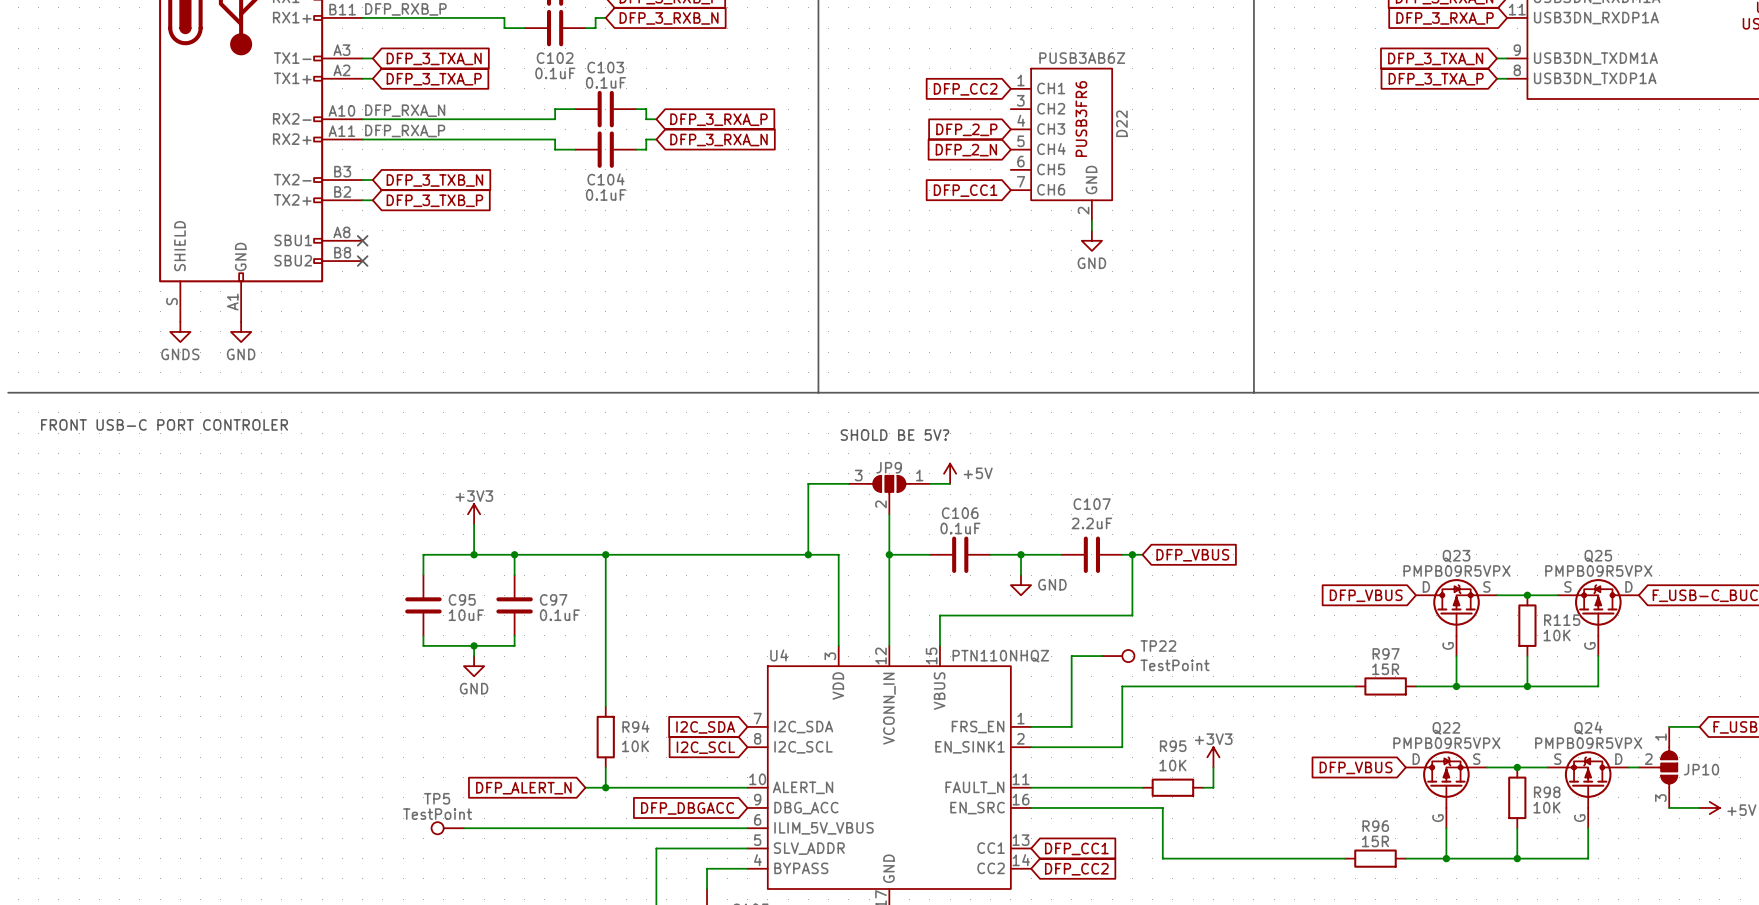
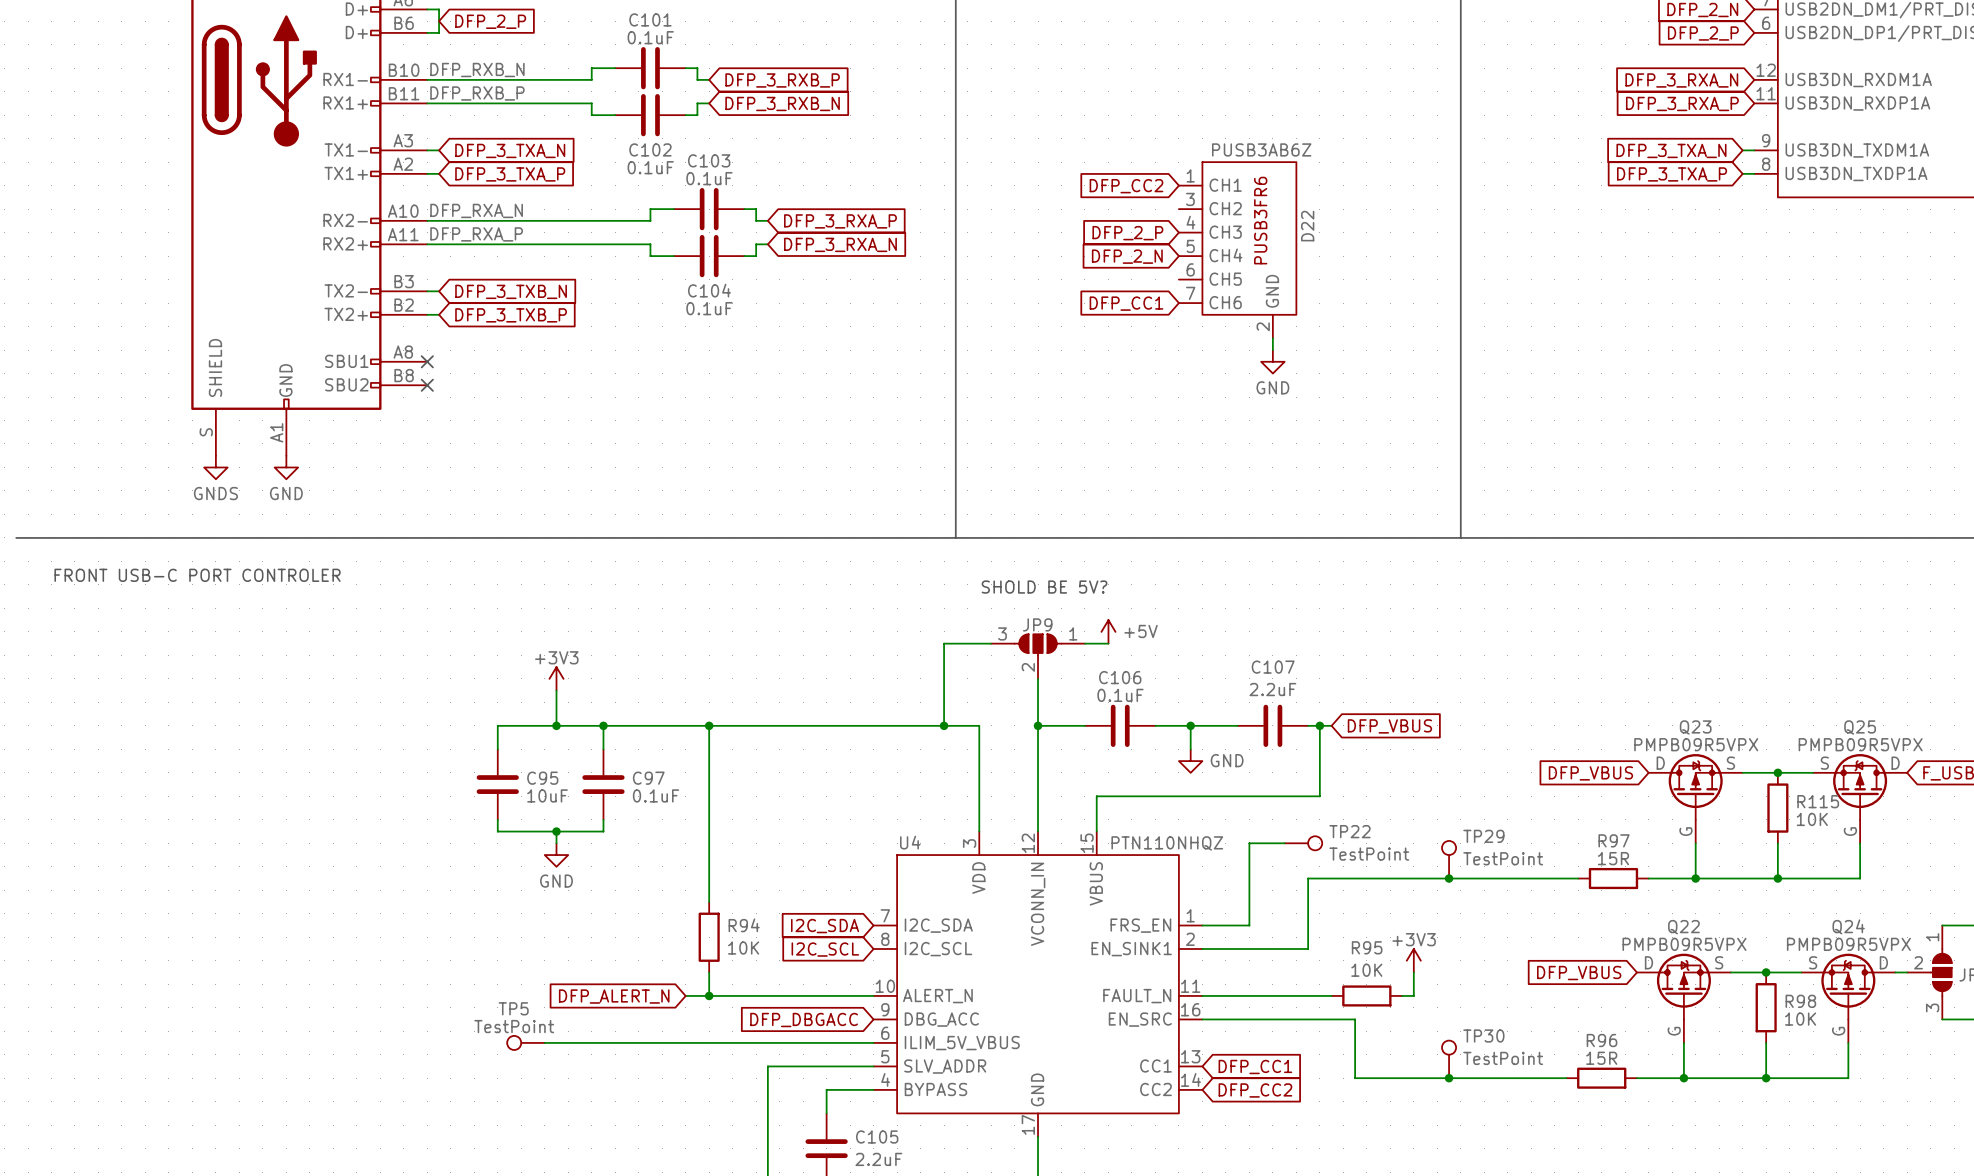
TP29: none -> TestPoint (1449, 859)
junction: none -> (1449, 878)
TP30: none -> TestPoint (1449, 1059)
junction: none -> (1449, 1078)

